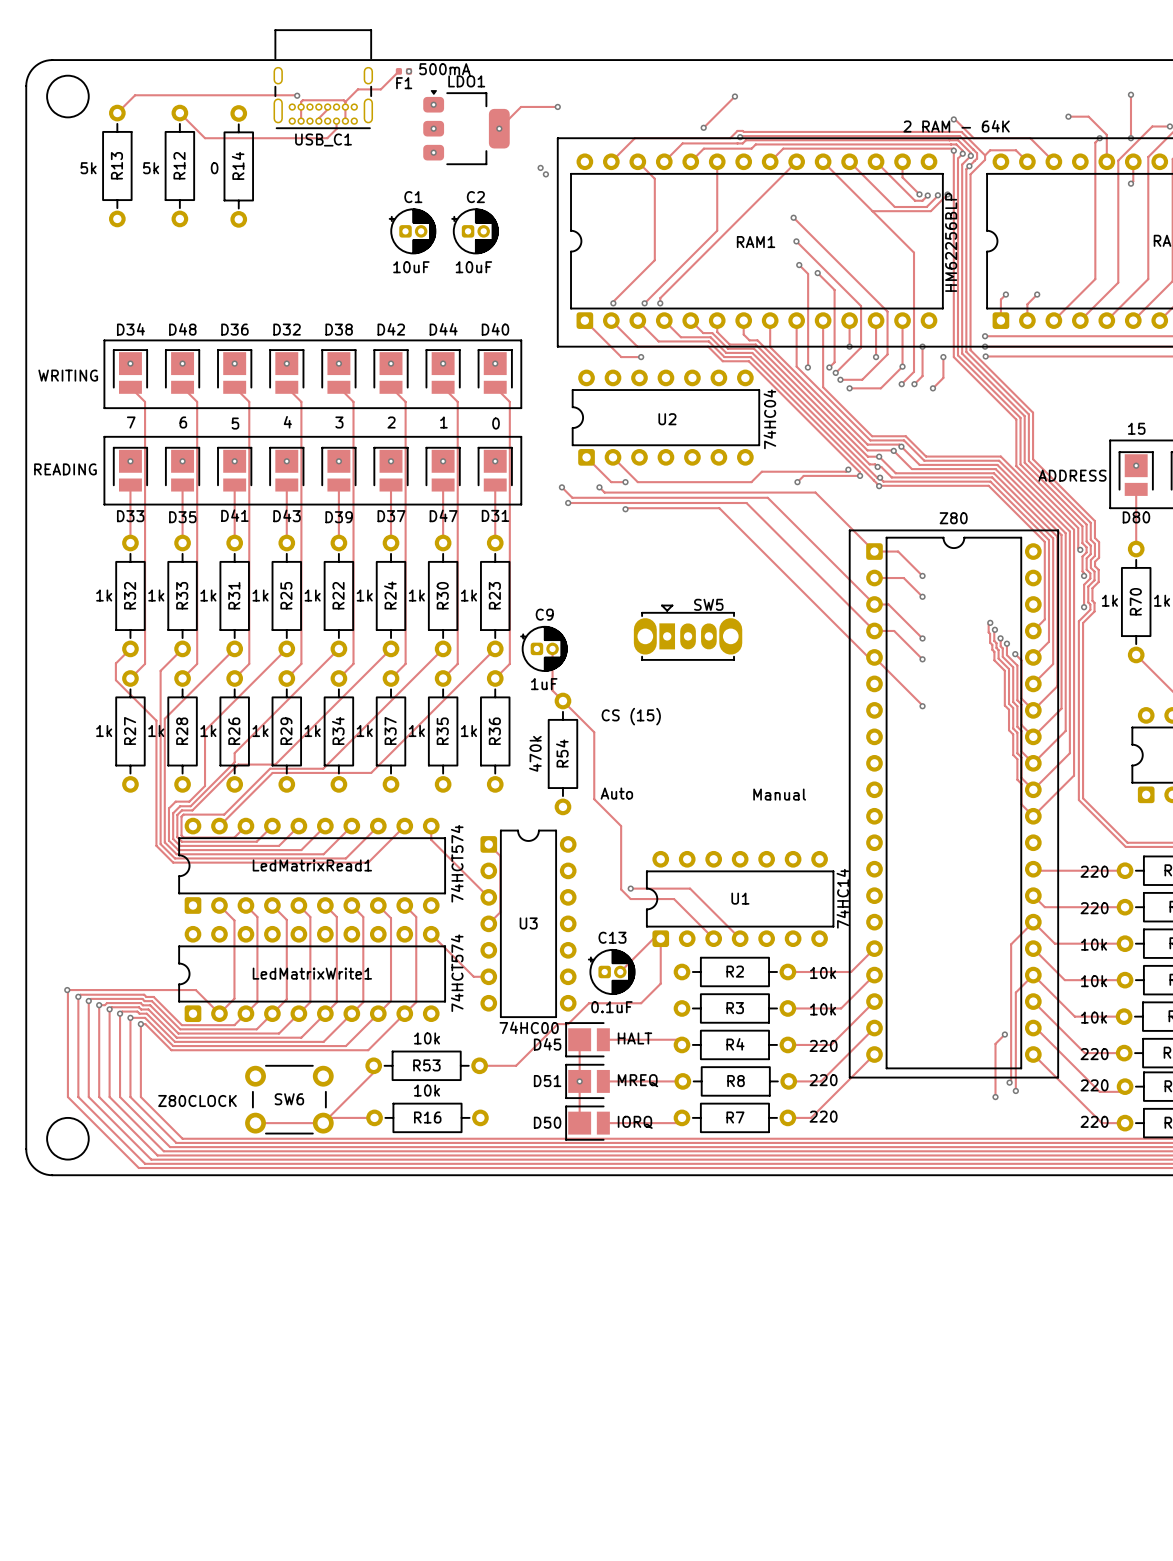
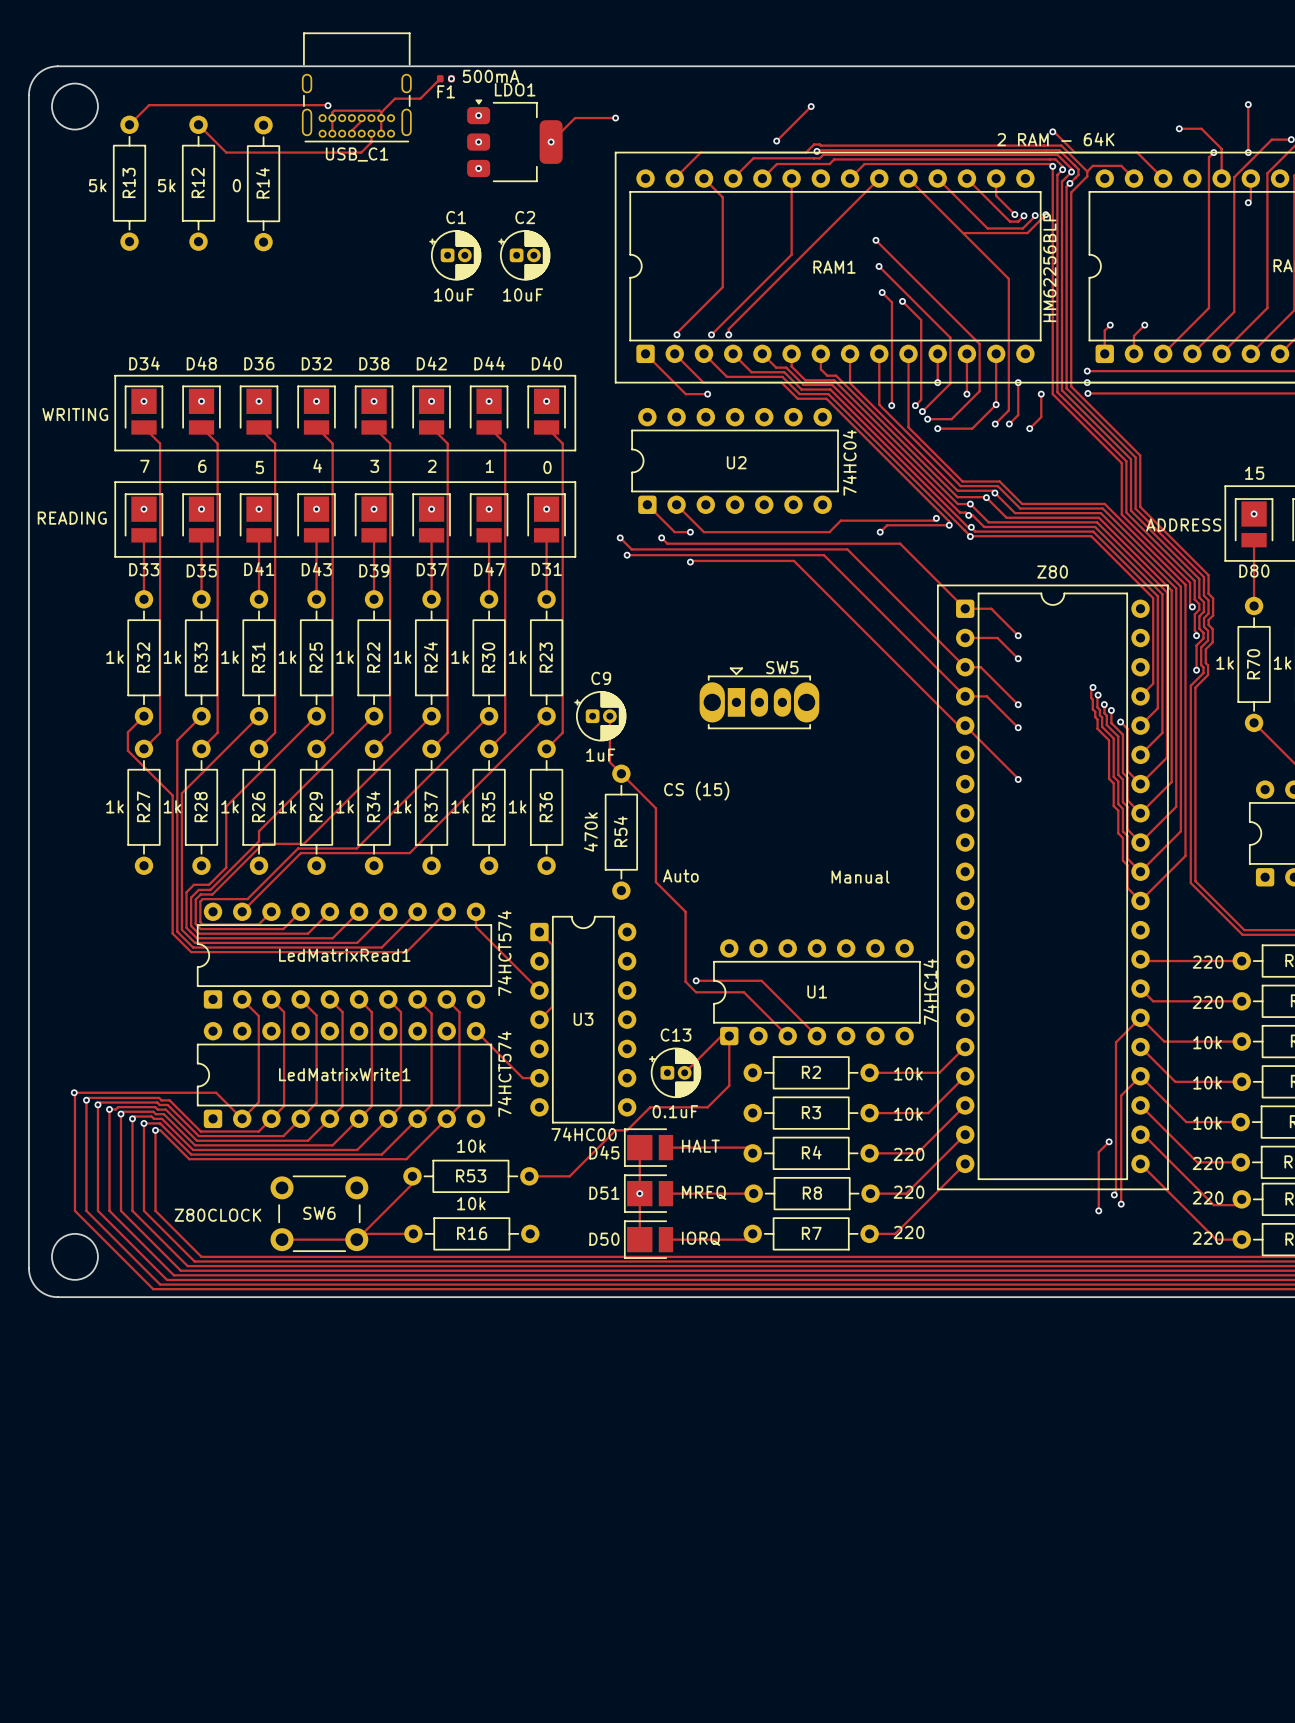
via: (540, 167) -> none
via: (545, 174) -> none

